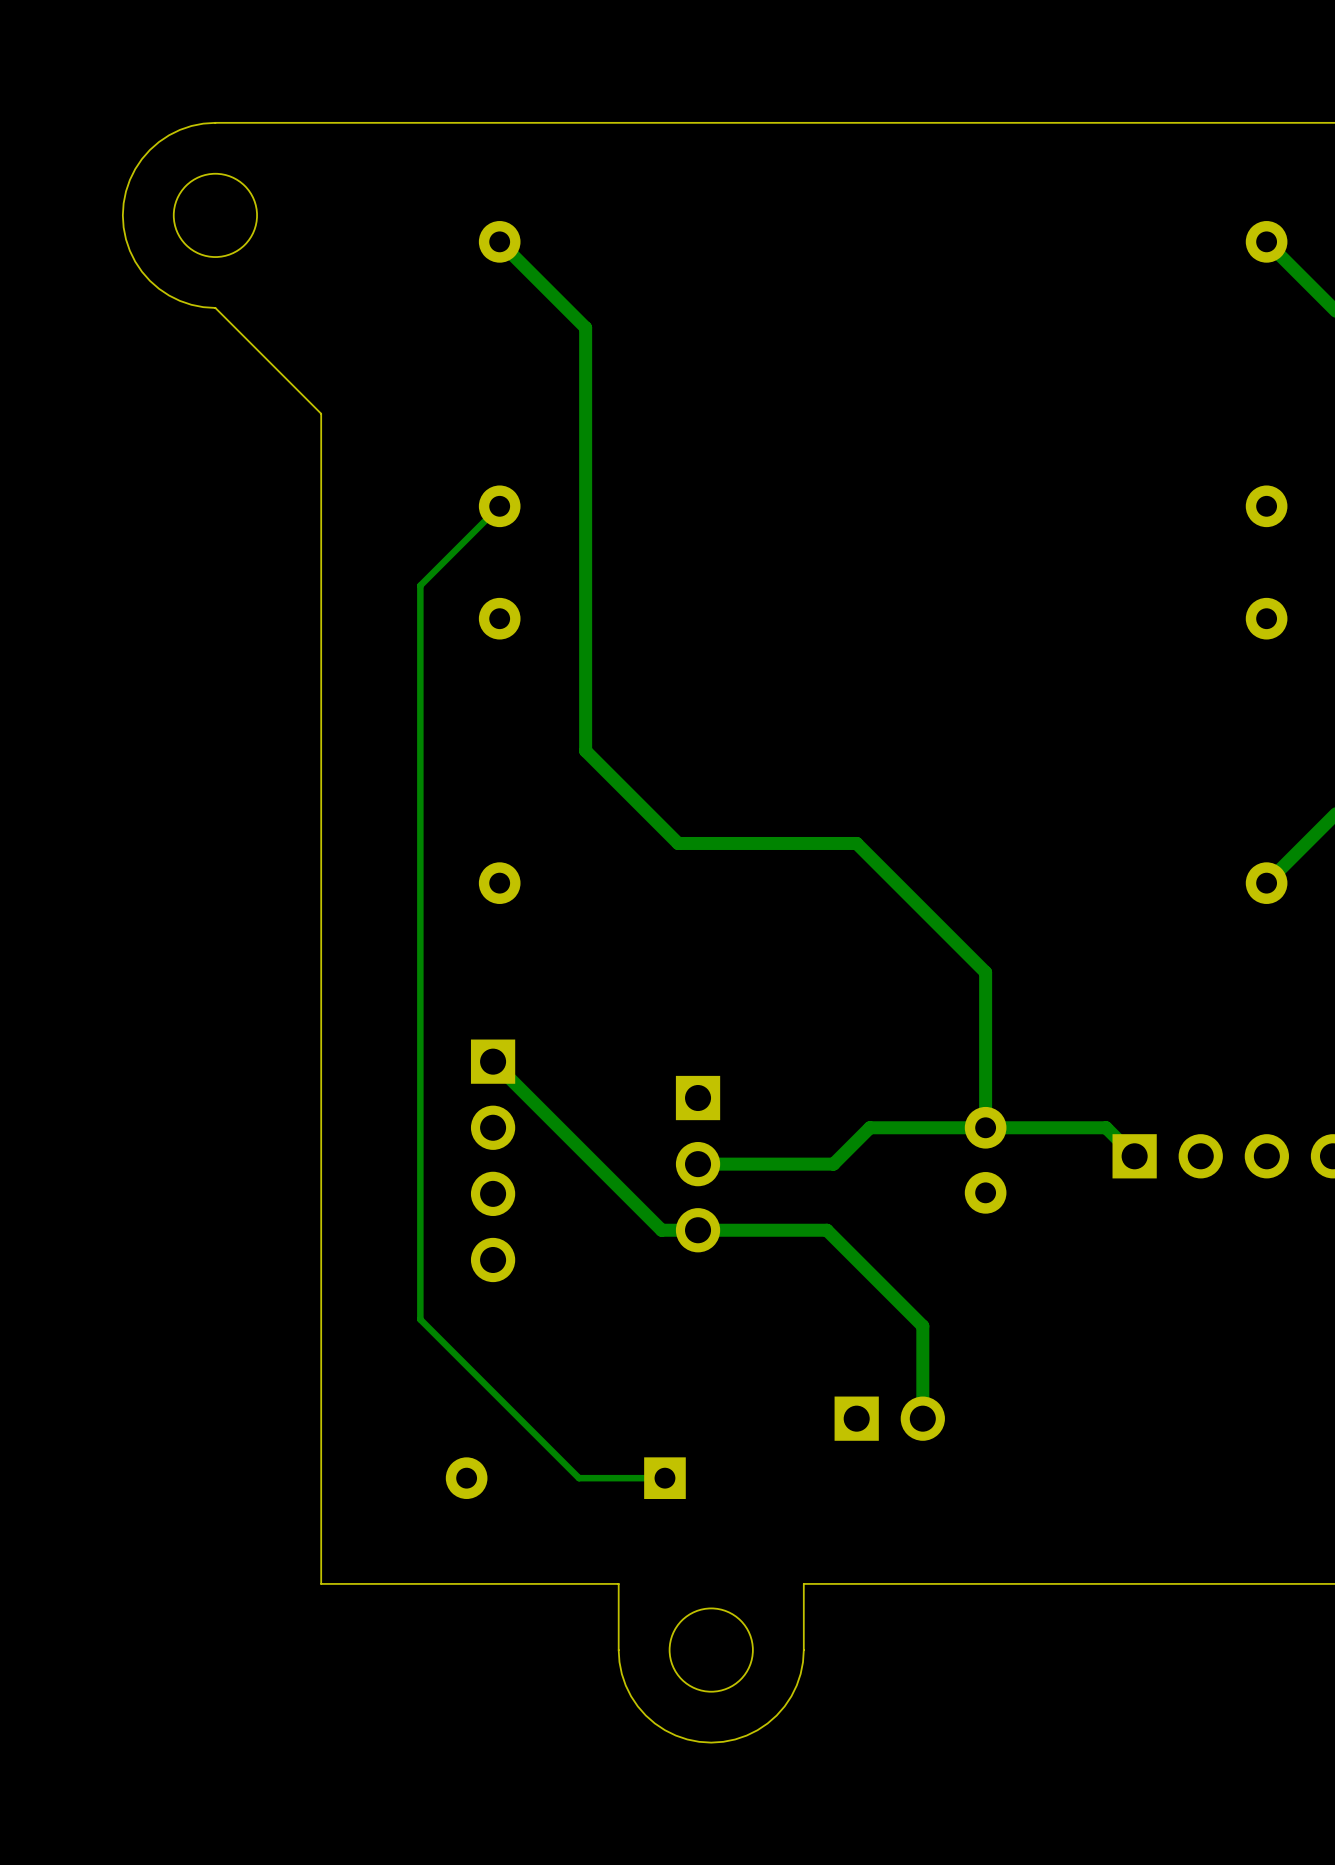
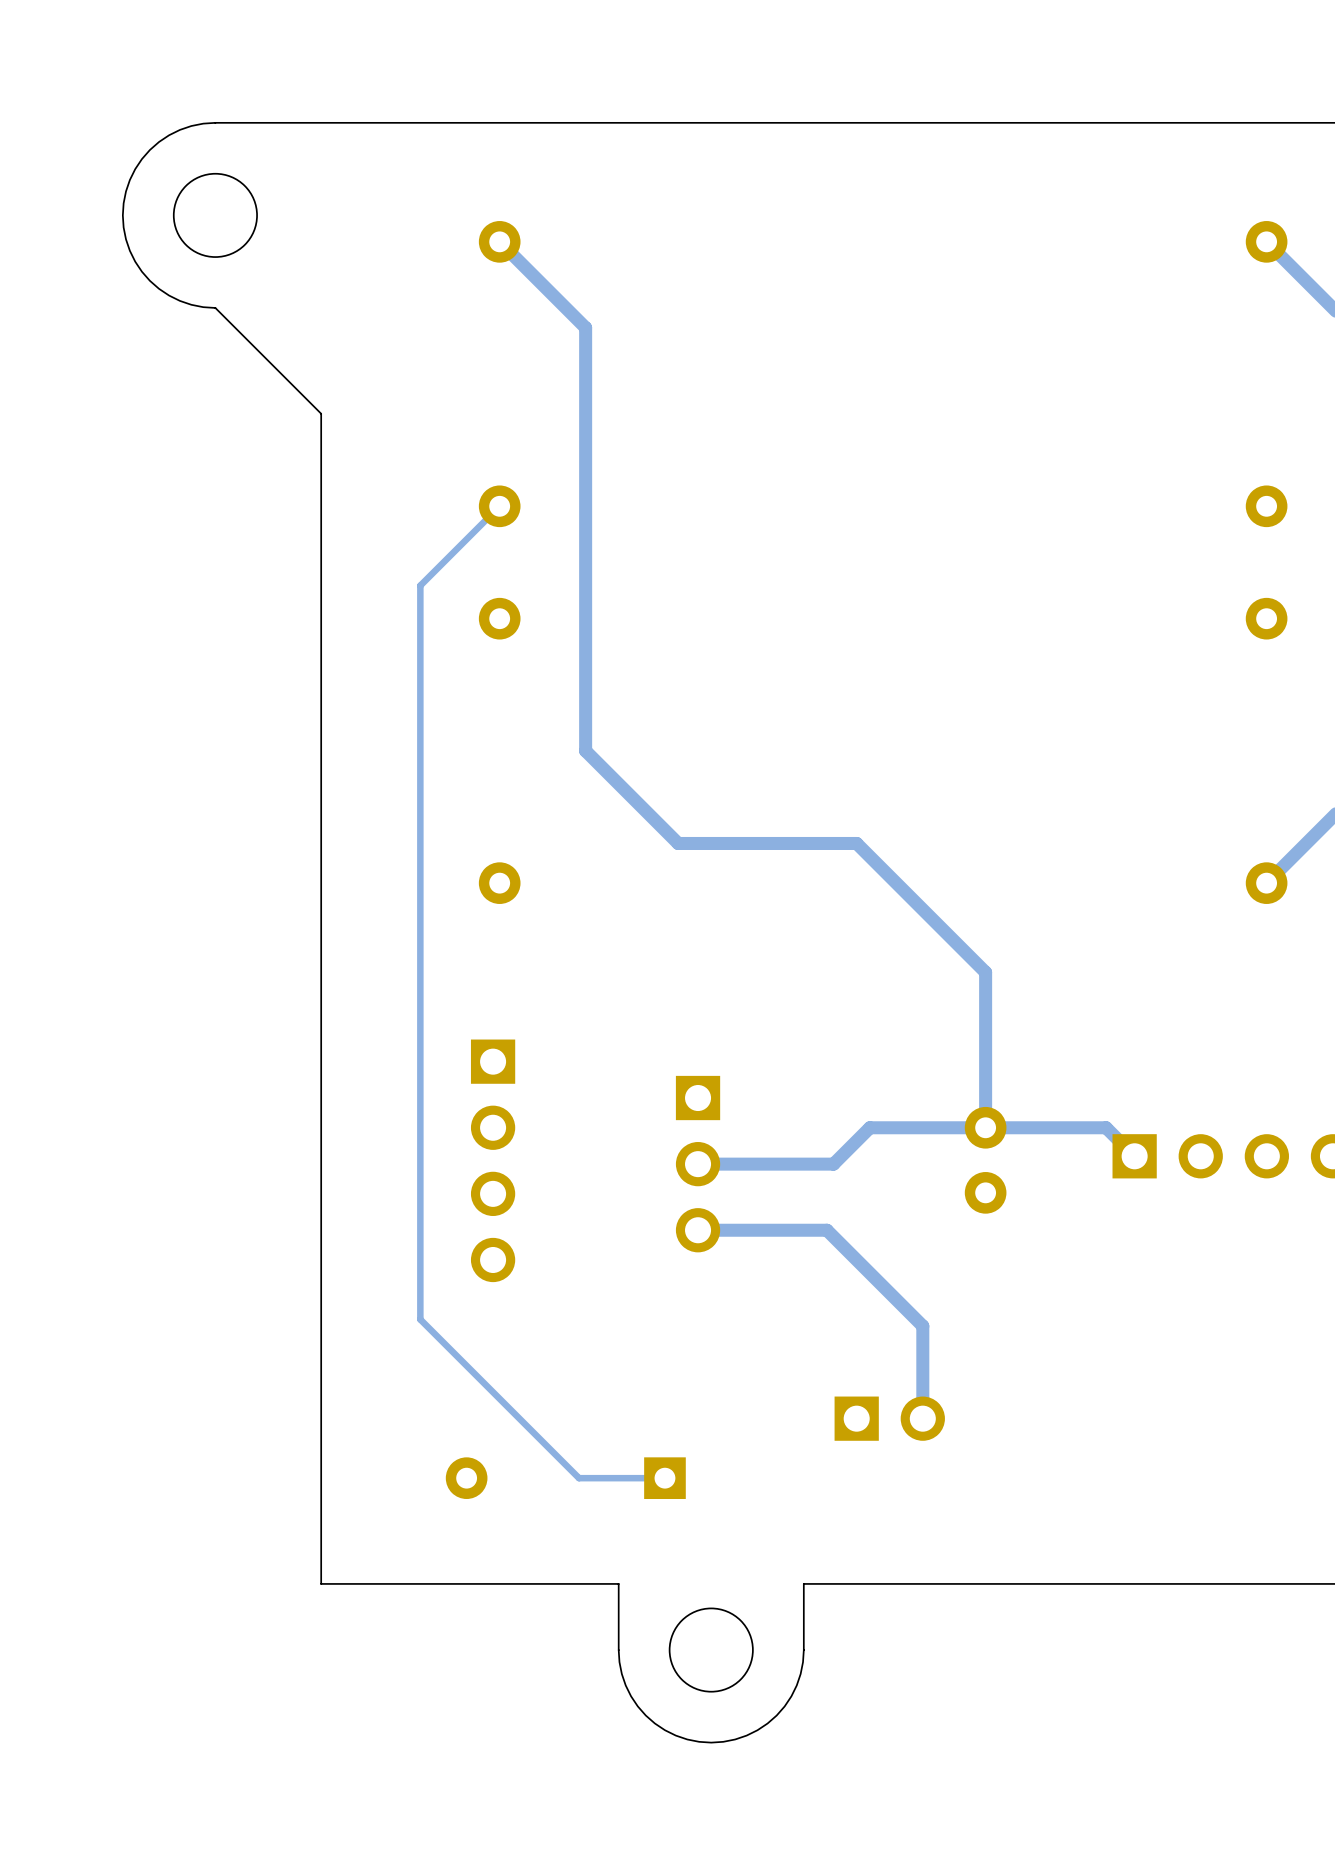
track: (493, 1061) (661, 1230) (698, 1230) -> none

